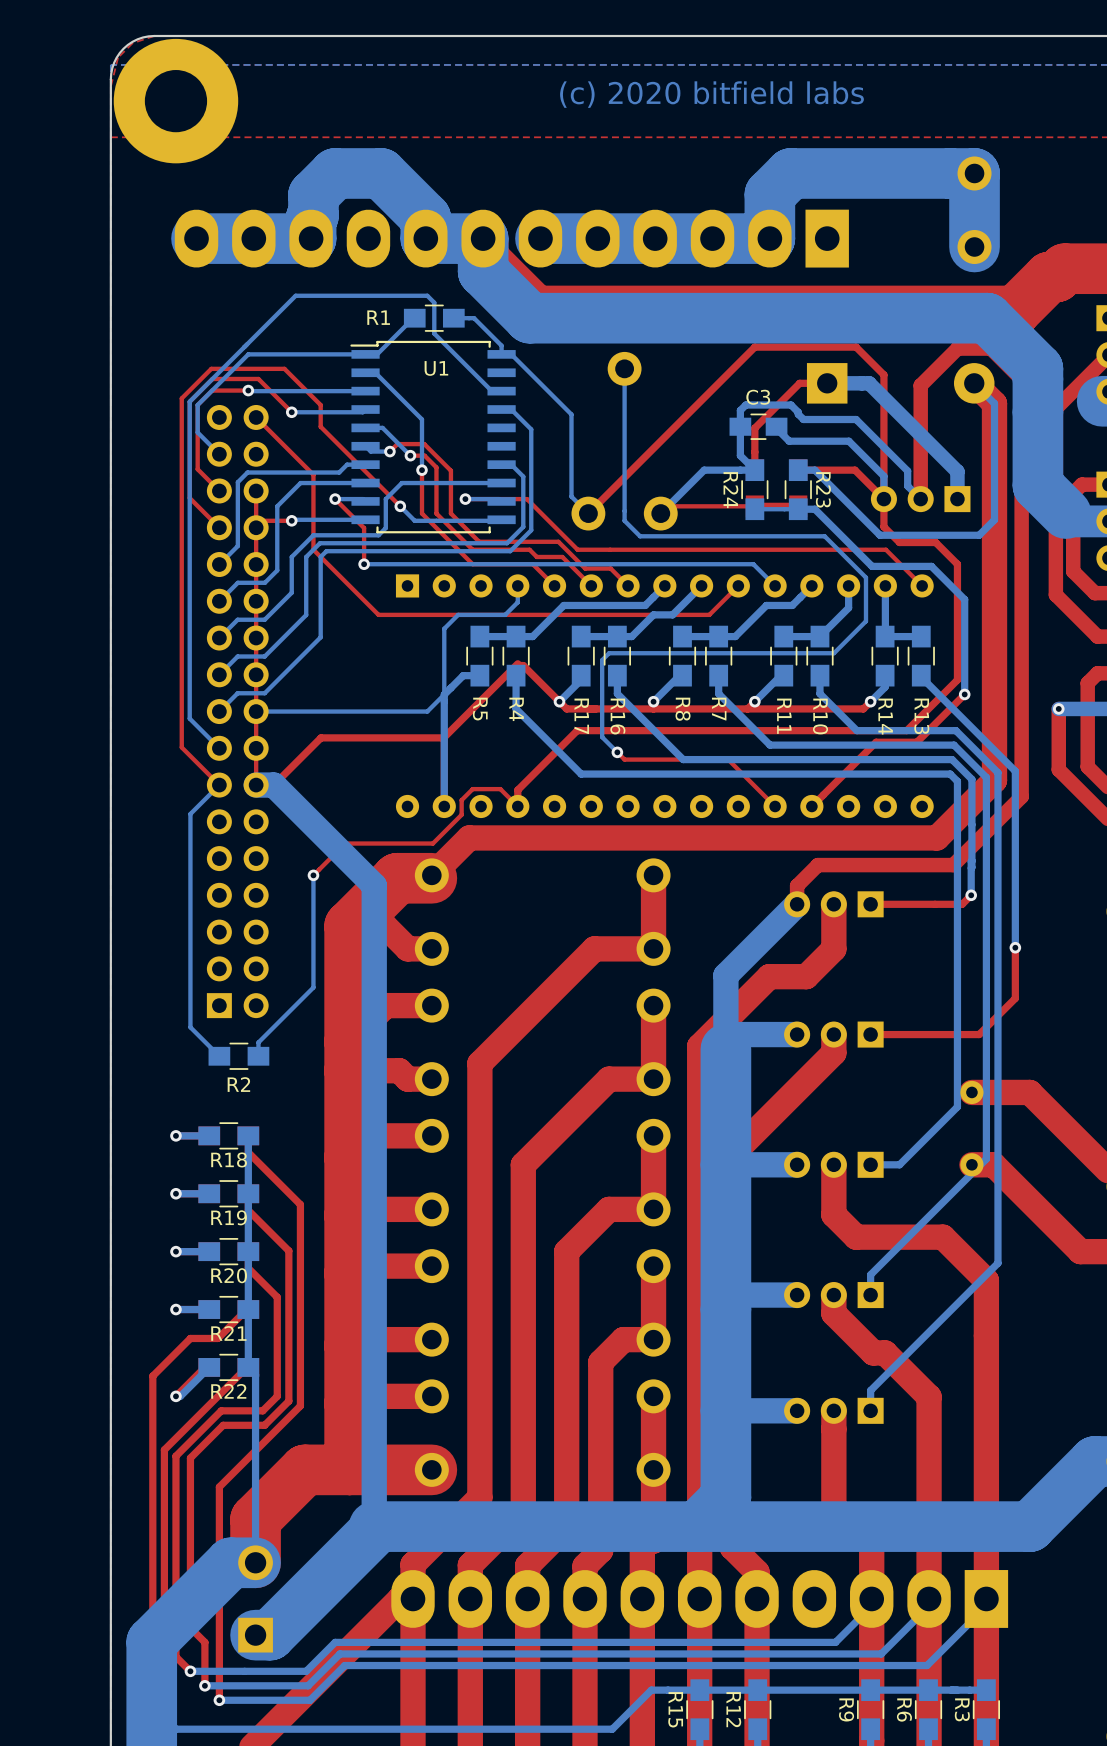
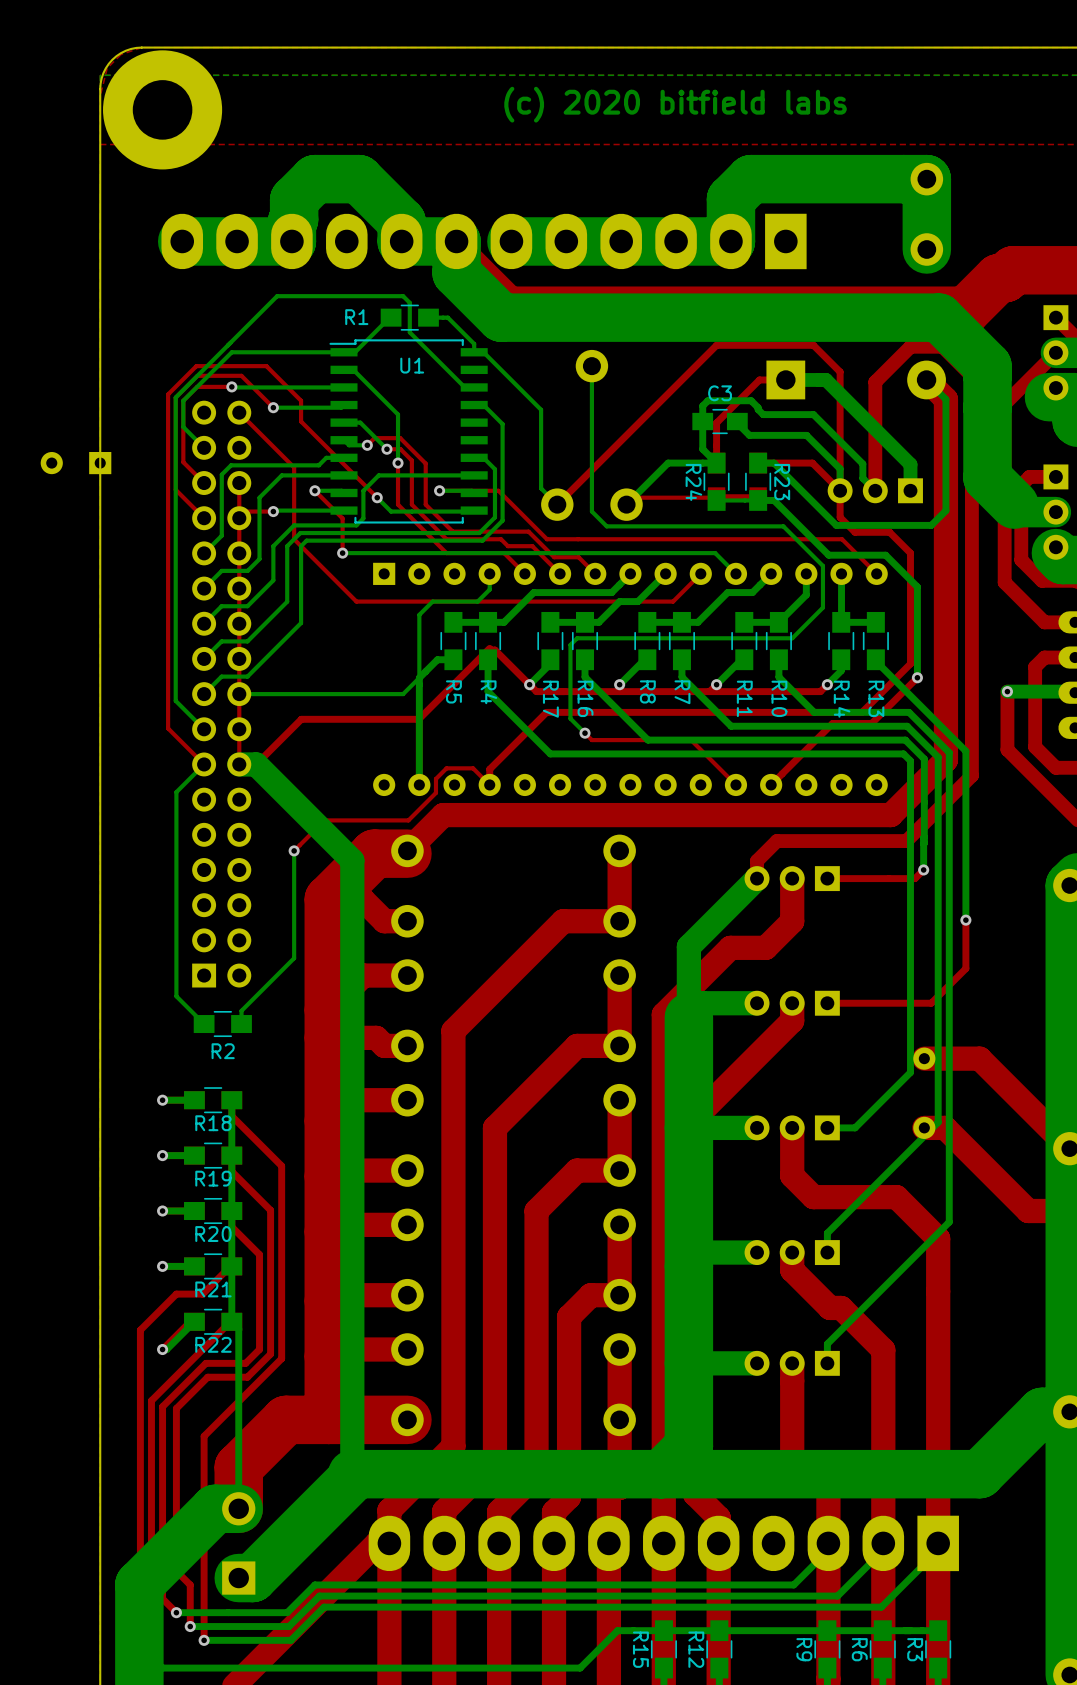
part: none -> (76, 463)

